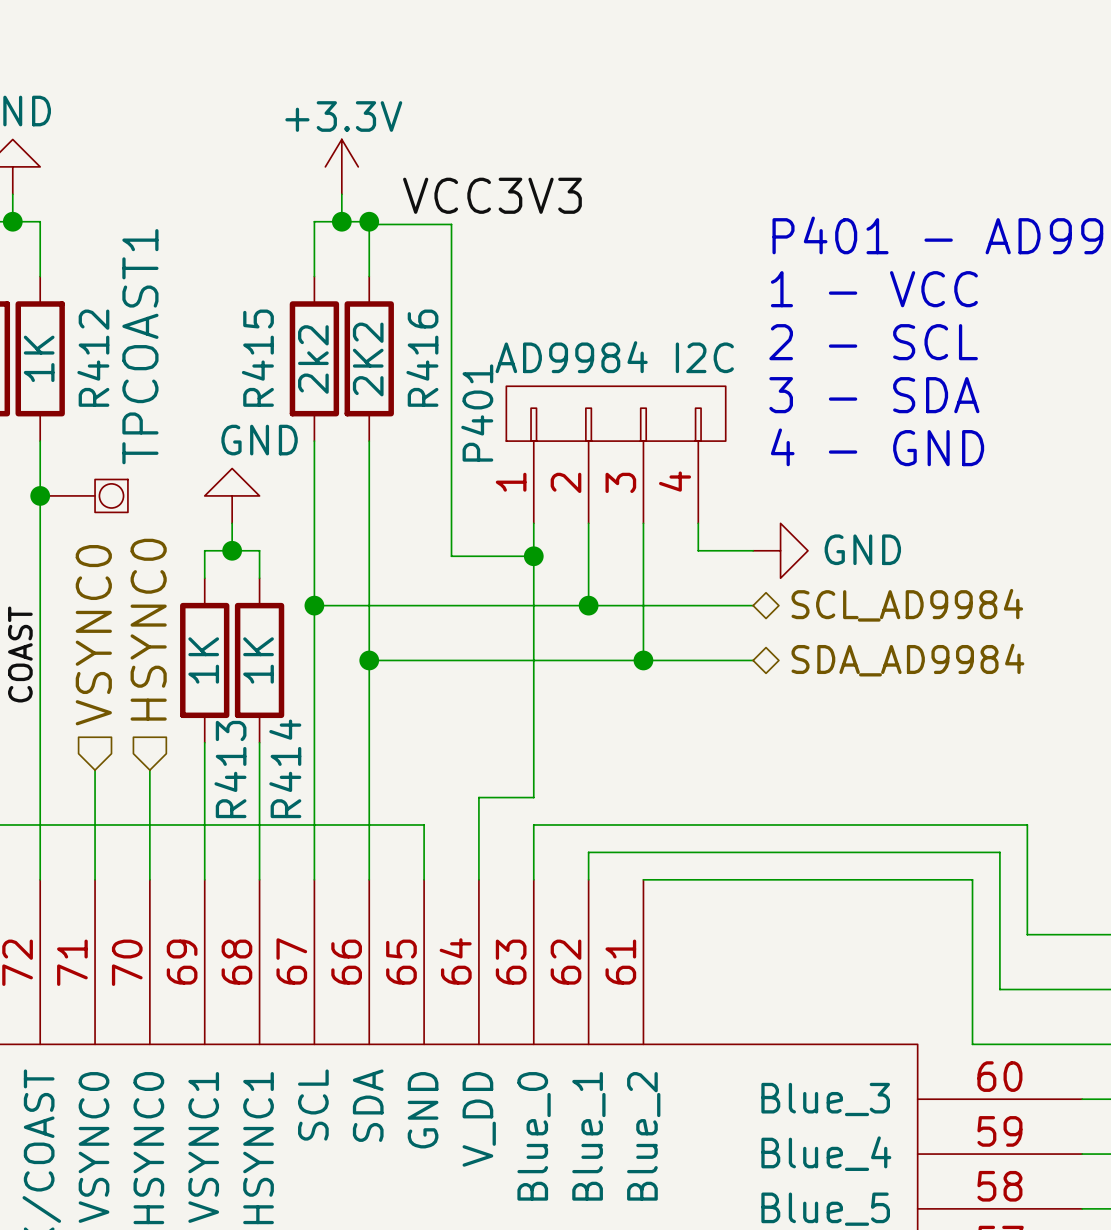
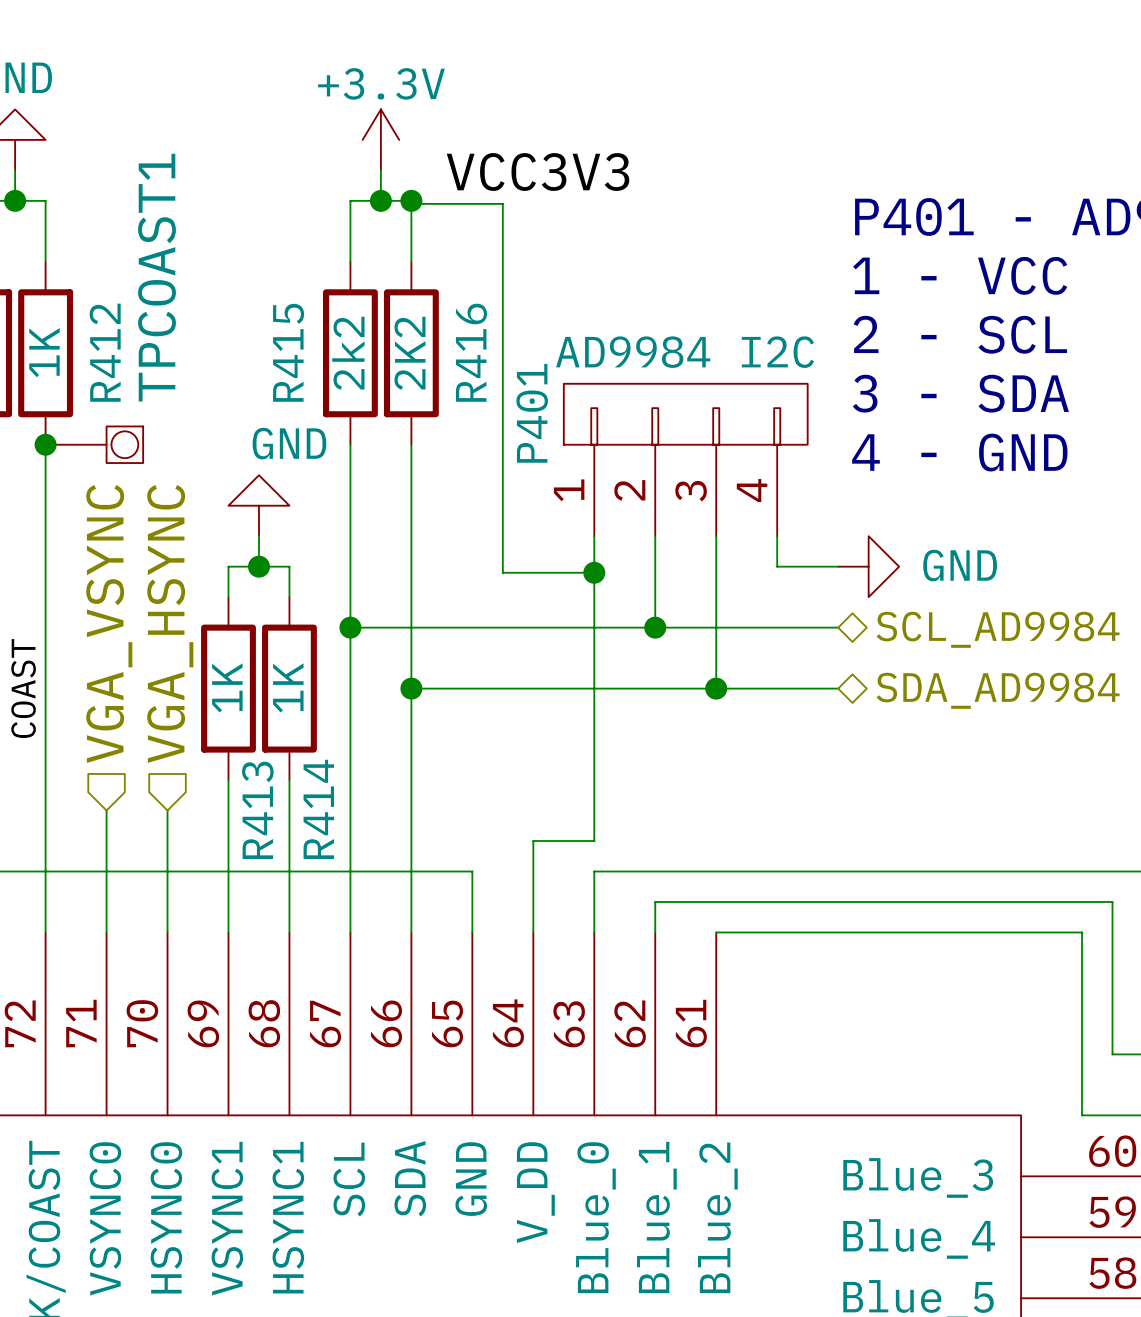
junction: none -> (45, 444)
junction: (40, 495) -> none
TPCOAST1 position: (84, 495) -> (94, 444)
hierarchical label: HSYNC0 (148, 629) -> VGA_HSYNC (170, 623)
hierarchical label: VSYNC0 (93, 635) -> VGA_VSYNC (109, 623)

